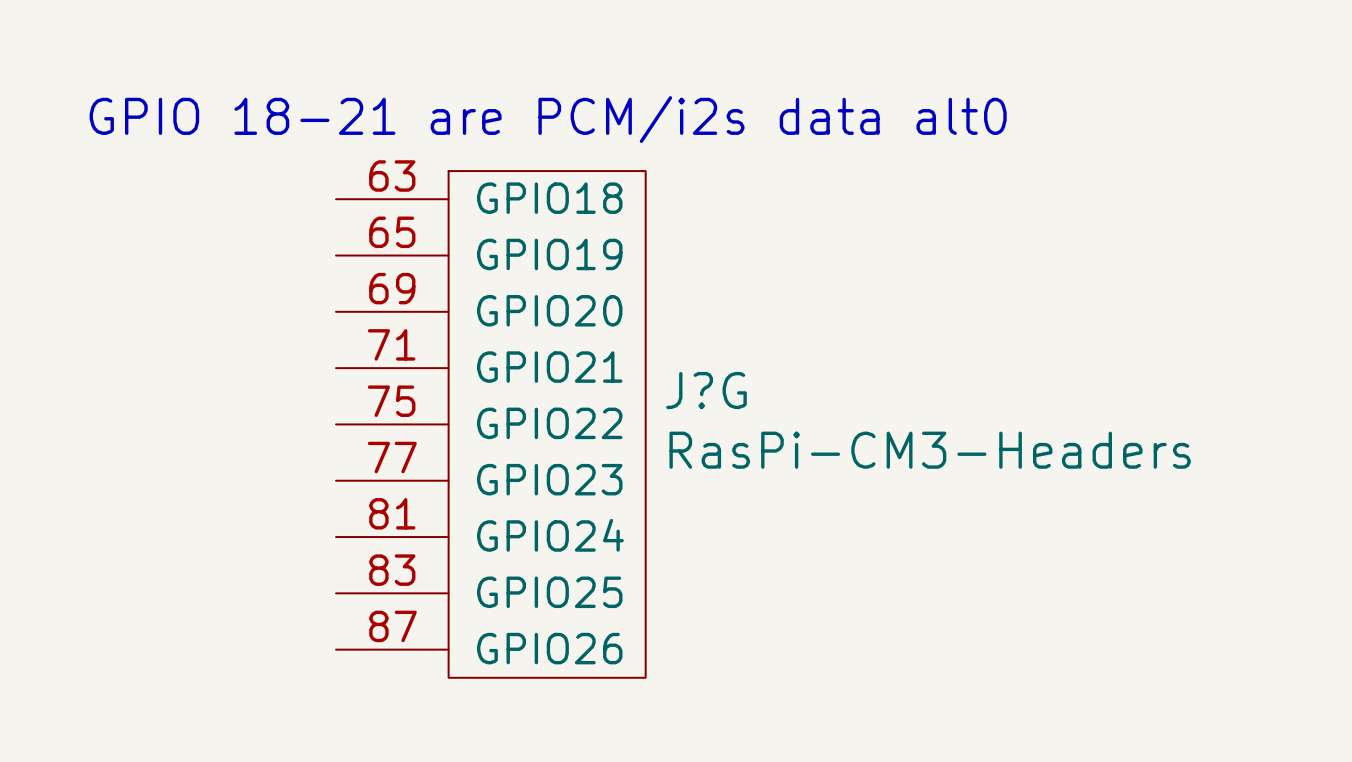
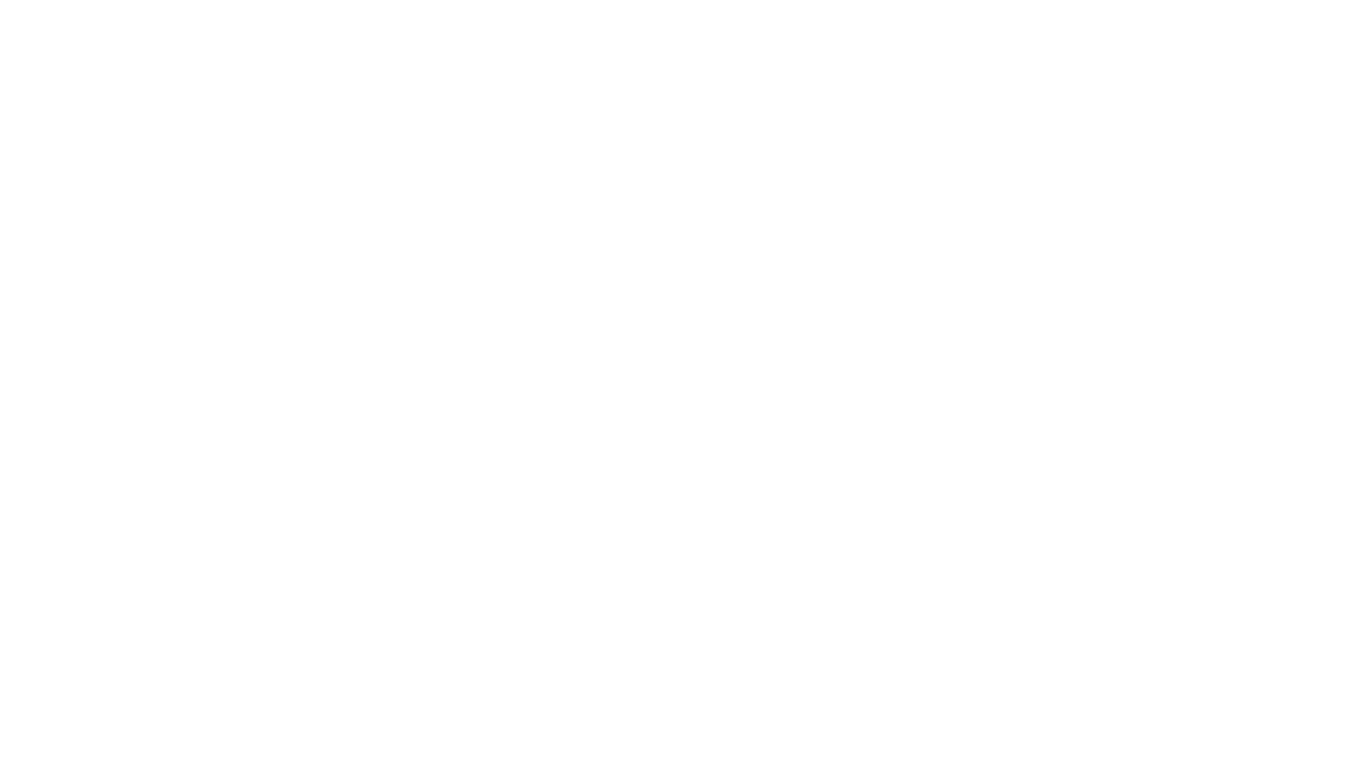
text: GPIO 18-21 are PCM/i2s data alt0 (548, 119) -> none
J?G: RasPi-CM3-Headers (490, 424) -> none

